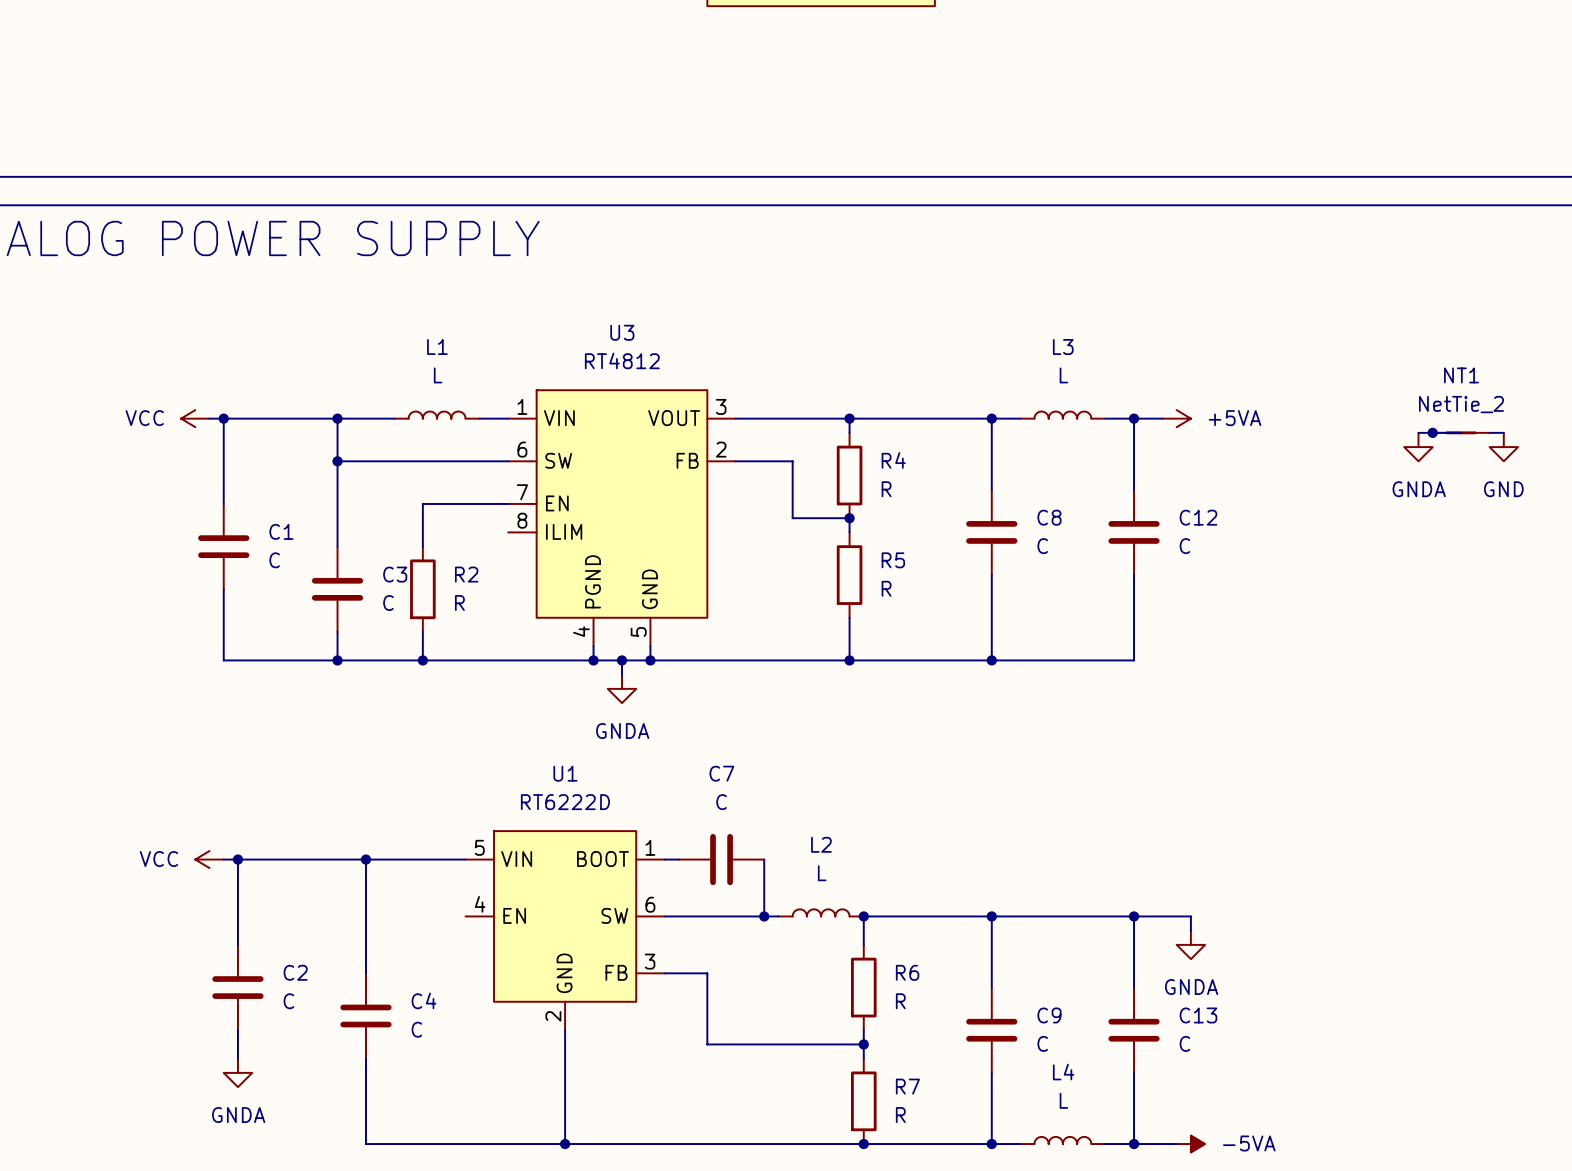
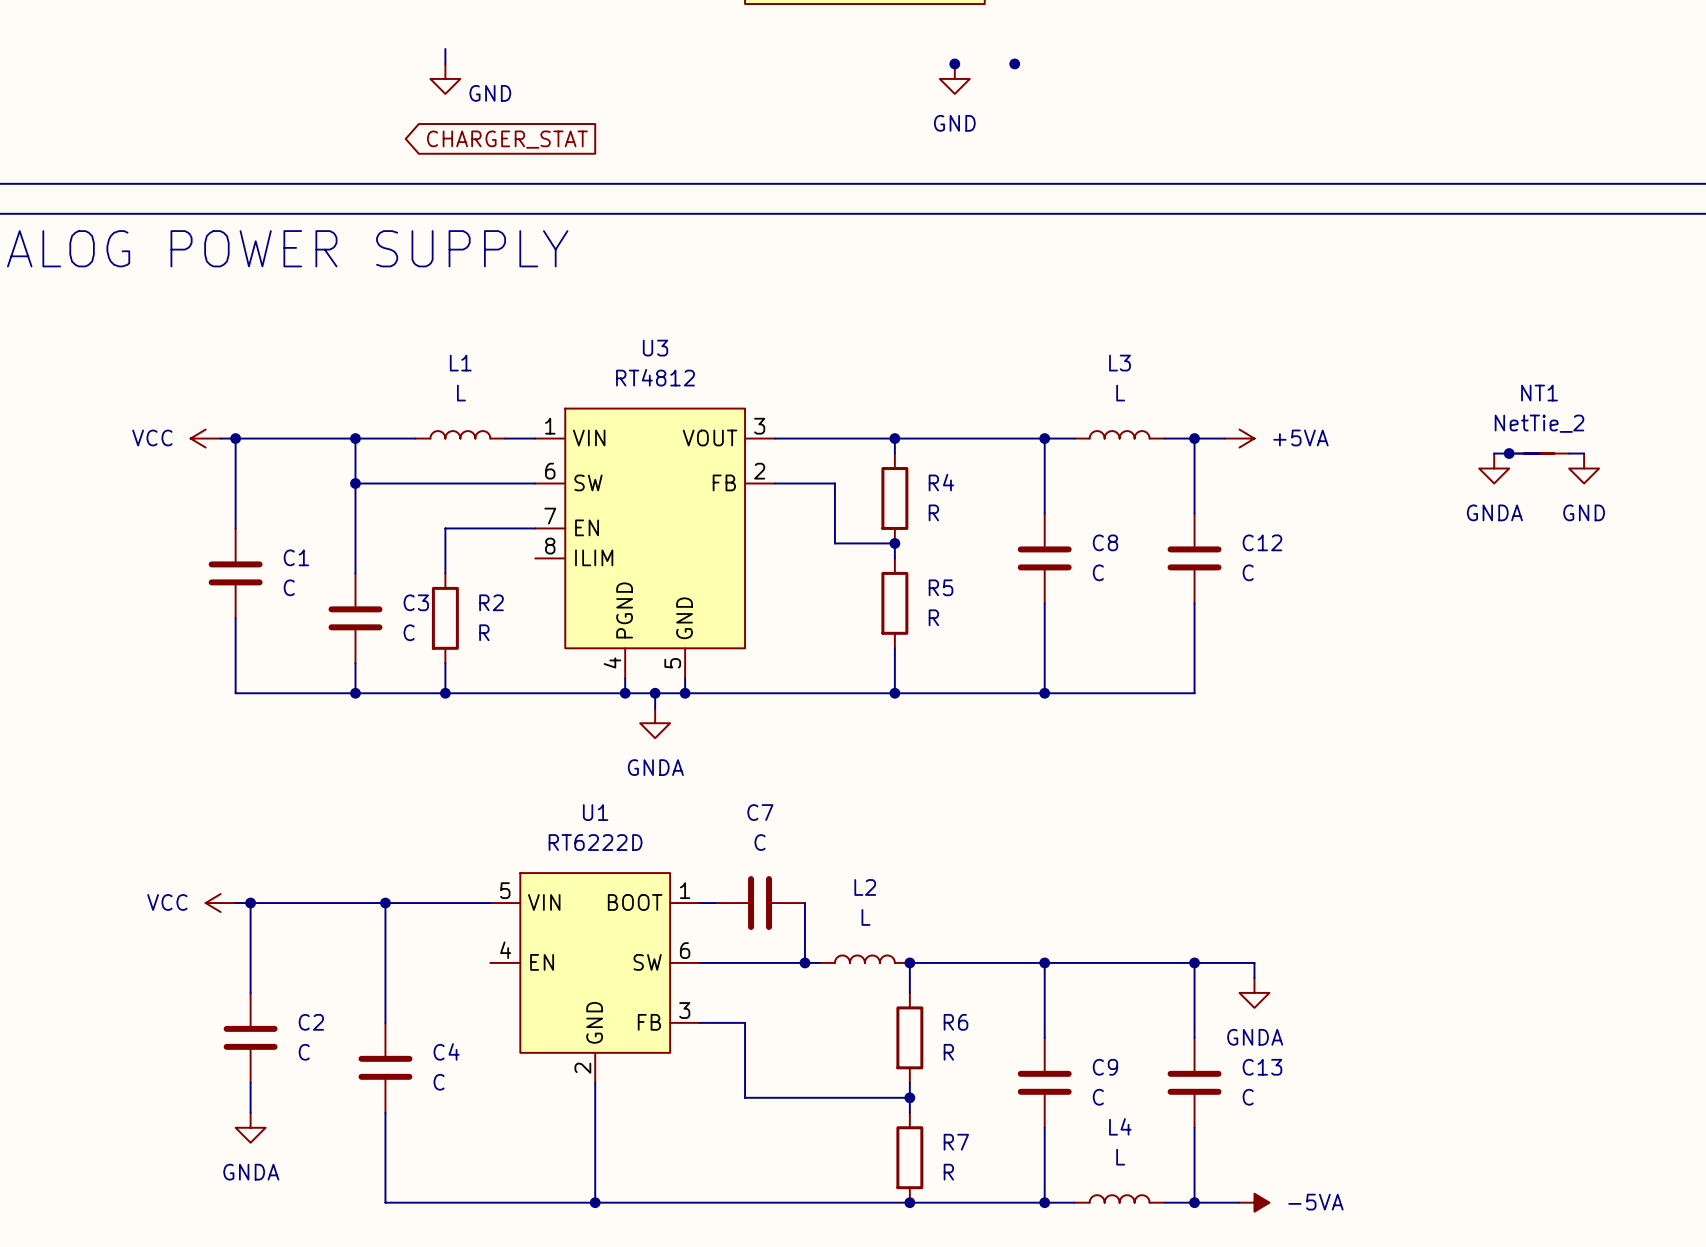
wire: none -> (445, 48) (445, 63)
junction: none -> (954, 63)
junction: none -> (1014, 63)
power symbol: none -> GND (445, 78)
power symbol: none -> GND (954, 78)
global label: none -> CHARGER_STAT (507, 139)

